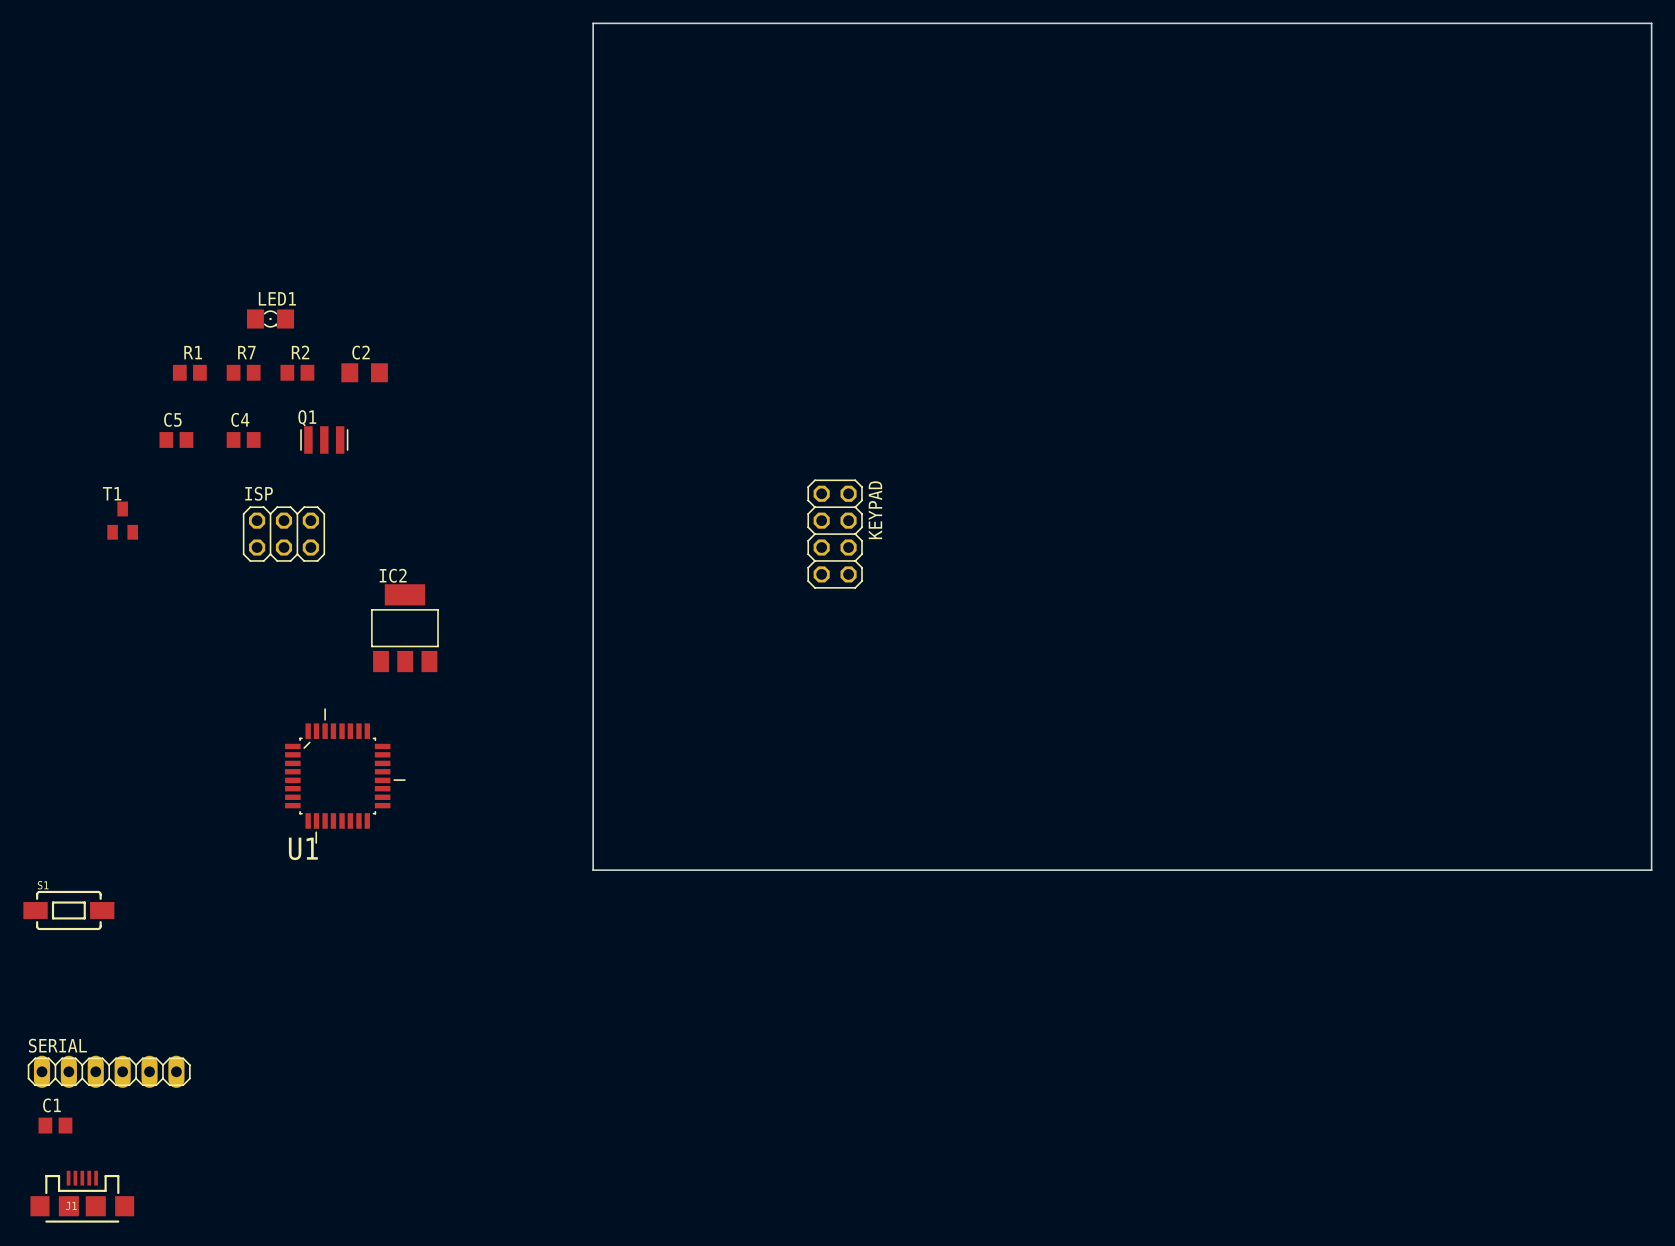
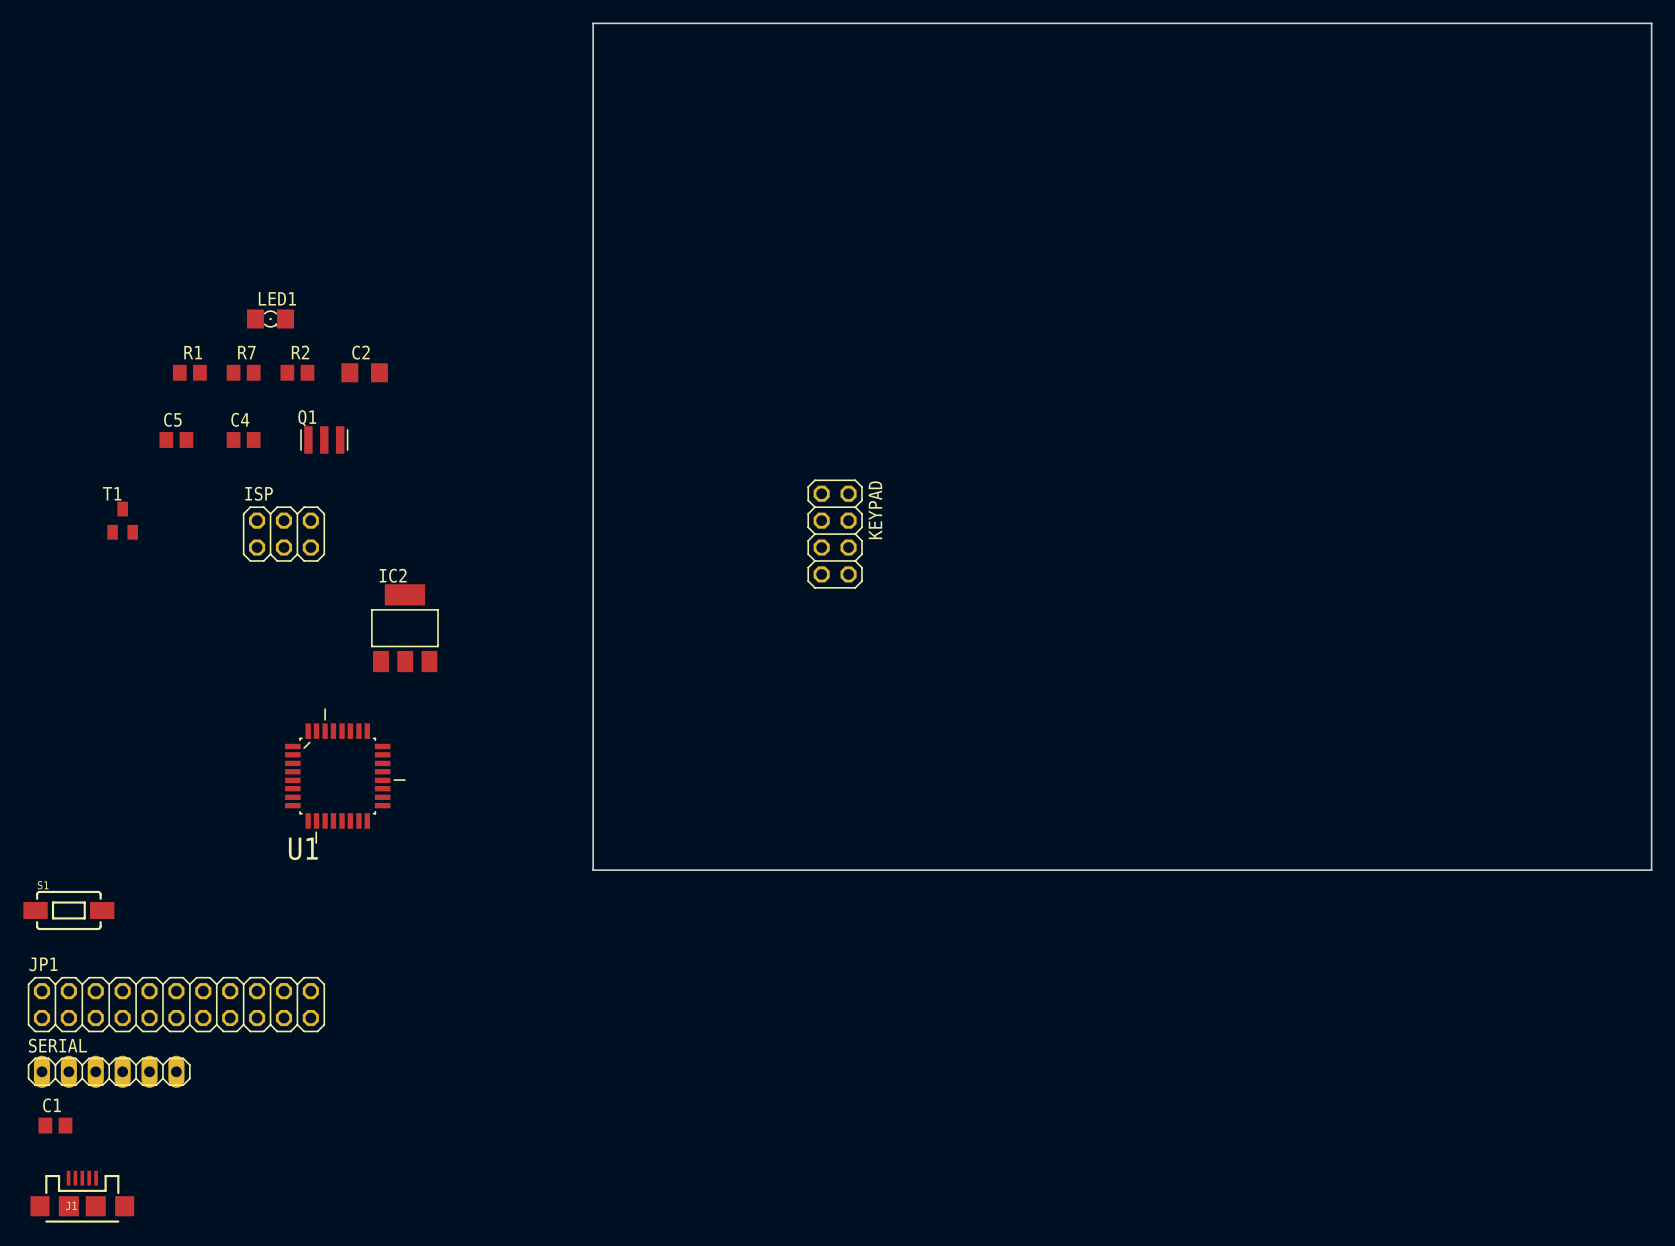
JP1: none -> (176, 1004)

